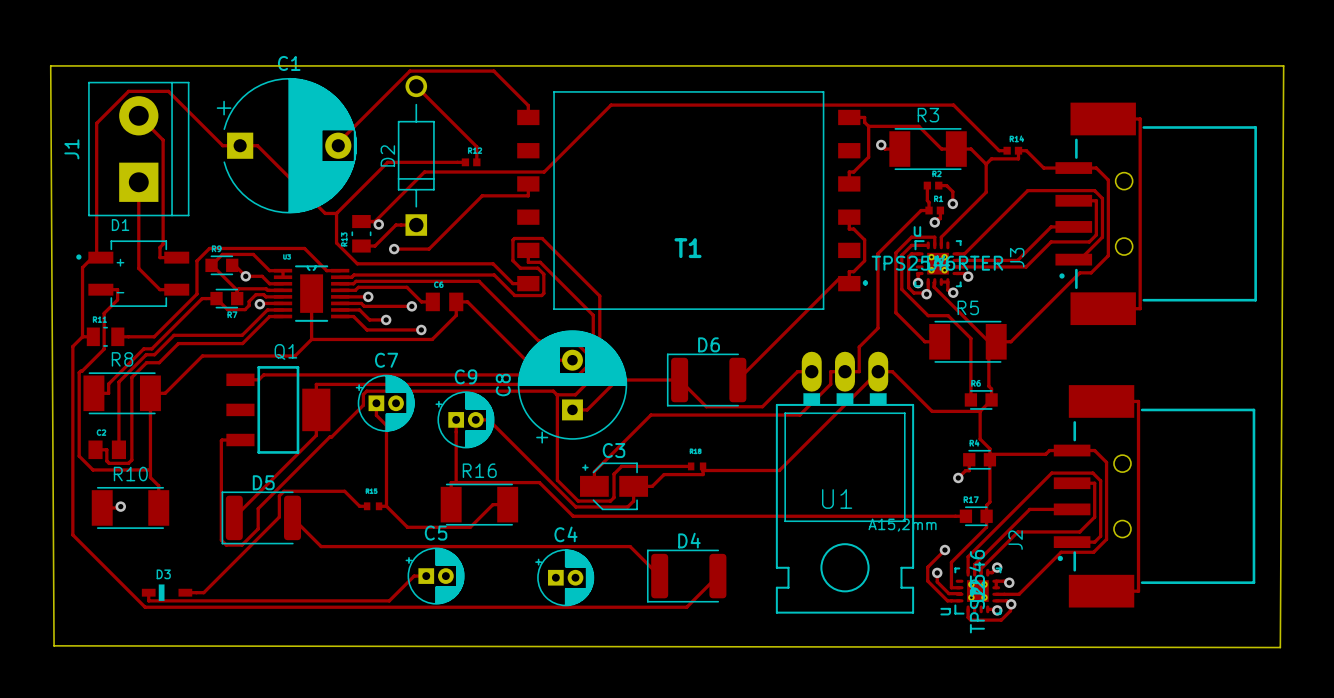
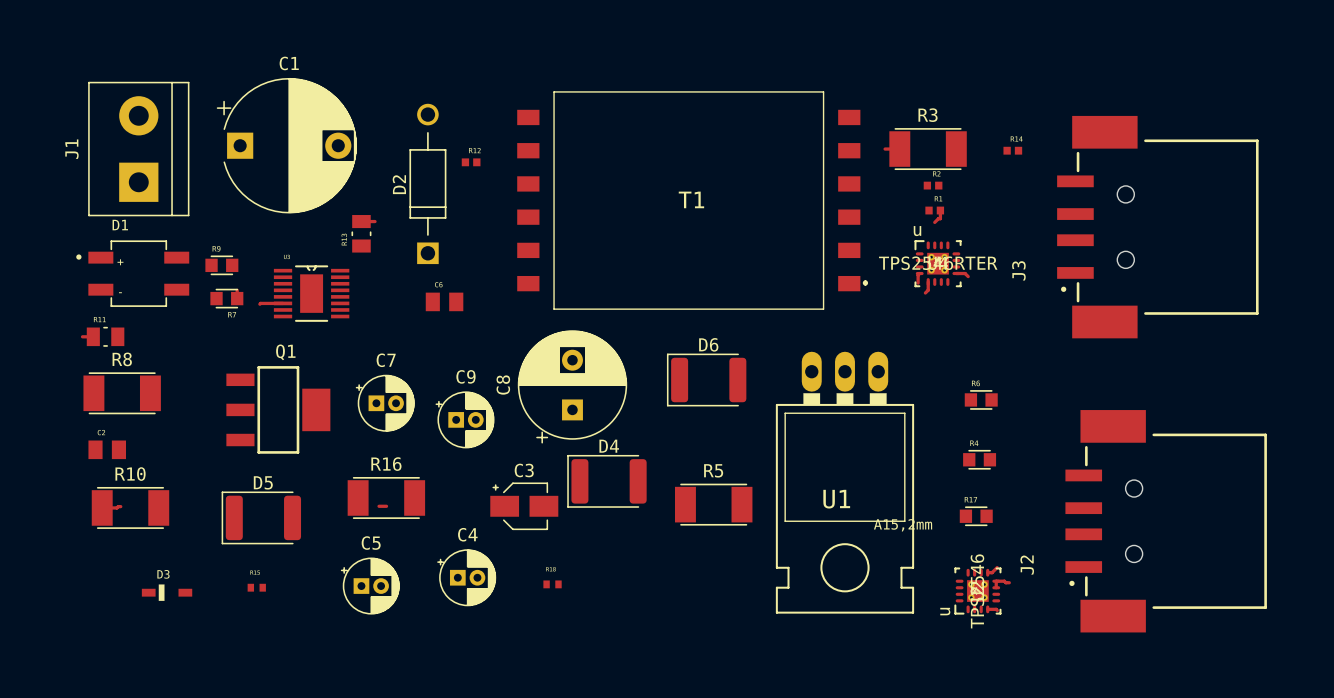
board edge: (50, 65) (54, 645) (1280, 647) (1283, 65) (50, 65) -> none
track: (416, 86) (476, 146) (476, 162) -> none
track: (138, 115) (163, 140) (163, 244) (159, 247) (159, 257) (176, 257) -> none
track: (528, 117) (528, 105) (493, 71) (409, 71) (338, 142) (338, 145) -> none
track: (849, 117) (864, 117) (864, 122) (868, 126) -> none
track: (1103, 118) (1140, 118) (1140, 308) (1103, 308) -> none
track: (868, 126) (868, 157) (853, 172) (849, 172) (849, 183) -> none
track: (868, 126) (918, 126) (941, 149) (971, 149) (986, 164) -> none
via: (881, 144) -> none
track: (1007, 150) (999, 150) (953, 105) (611, 105) (544, 172) (424, 172) (375, 221) (378, 224) -> none
D2 position: (416, 155) -> (427, 183)
track: (465, 162) (387, 162) (336, 213) -> none
track: (986, 164) (991, 158) (1018, 158) (1018, 150) (1026, 150) (1043, 168) (1096, 168) (1108, 180) (1108, 255) (1091, 272) (1079, 272) (1010, 341) (988, 341) -> none
track: (986, 164) (986, 192) (941, 237) (941, 245) -> none
track: (138, 182) (138, 268) (159, 289) (176, 289) -> none
track: (528, 183) (528, 195) (482, 195) (429, 249) (394, 249) -> none
track: (927, 185) (929, 210) (921, 210) (877, 253) (877, 328) (859, 347) (859, 371) (830, 371) (830, 384) (799, 415) (650, 415) (594, 471) (594, 486) -> none
track: (938, 185) (946, 185) (952, 191) (952, 203) -> none
track: (1073, 200) (1096, 200) (1096, 234) (1089, 241) (1051, 241) (1026, 266) (956, 266) -> none
via: (952, 203) -> none
track: (336, 213) (336, 243) (357, 263) (493, 263) (512, 283) (528, 283) -> none
track: (336, 213) (325, 213) (257, 145) (222, 145) (168, 91) (128, 91) (96, 123) (96, 257) -> none
J3 position: (1156, 213) -> (1157, 227)
track: (849, 217) (849, 229) (853, 229) (864, 239) (864, 260) (853, 271) (849, 271) (849, 283) -> none
via: (934, 222) -> none
via: (378, 224) -> none
track: (416, 225) (395, 225) (375, 246) (361, 246) -> none
track: (1073, 226) (1051, 226) (1017, 260) (956, 260) -> none
track: (928, 245) (911, 245) (901, 255) (901, 289) (928, 315) (948, 315) (970, 338) (970, 399) -> none
track: (934, 245) (934, 237) (911, 237) (895, 252) (895, 312) (924, 341) (939, 341) -> none
T1 name position: T1 (688, 248) -> T1 (691, 199)
via: (394, 249) -> none
track: (528, 250) (528, 262) (540, 262) (593, 315) (593, 368) (577, 384) (316, 384) (316, 435) (234, 517) -> none
track: (919, 253) (911, 253) (908, 256) (908, 287) (913, 293) (926, 294) -> none
track: (956, 253) (964, 253) (1027, 190) (1094, 190) (1102, 198) (1102, 237) (1080, 259) (1073, 259) -> none
track: (100, 257) (92, 257) (82, 267) (82, 336) (72, 346) (72, 534) (145, 607) (686, 607) (717, 576) -> none
track: (232, 265) (234, 265) (245, 276) (262, 276) (269, 283) (283, 283) -> none
track: (340, 270) (326, 270) (304, 248) (209, 248) (196, 261) (196, 294) (154, 336) (117, 336) -> none
via: (245, 276) -> none
via: (968, 276) -> none
track: (283, 277) (283, 270) (269, 270) (253, 254) (222, 254) (211, 265) (237, 290) (238, 288) (283, 290) -> none
track: (340, 277) (351, 277) (354, 275) (494, 275) (514, 295) (541, 295) (543, 293) (543, 274) (537, 268) (520, 268) (512, 260) (512, 240) (514, 238) (542, 238) (599, 296) (599, 370) (575, 394) (557, 395) -> none
track: (849, 277) (840, 277) (737, 380) -> none
track: (934, 282) (934, 287) (988, 341) -> none
track: (941, 282) (947, 282) (947, 290) (953, 292) -> none
track: (340, 283) (353, 283) (356, 281) (479, 281) (538, 341) (574, 341) (587, 353) (587, 366) (578, 374) (263, 374) (258, 379) (240, 379) -> none
via: (918, 283) -> none
track: (100, 289) (117, 289) (117, 299) (104, 313) (104, 349) (79, 372) (79, 456) (93, 469) (150, 469) -> none
track: (340, 290) (355, 290) (358, 287) (406, 287) (421, 301) (432, 301) -> none
via: (953, 292) -> none
track: (311, 293) (311, 339) -> none
via: (926, 294) -> none
track: (283, 296) (255, 294) (245, 309) (227, 309) (216, 298) (202, 298) (151, 348) (143, 348) (108, 384) (108, 393) (93, 393) -> none
track: (340, 296) (368, 296) -> none
via: (368, 296) -> none
track: (340, 303) (361, 303) (364, 306) (411, 306) -> none
via: (259, 304) -> none
via: (411, 306) -> none
track: (283, 309) (267, 309) (242, 335) (174, 335) (154, 354) (146, 354) (118, 382) (118, 449) -> none
track: (340, 309) (359, 309) (369, 319) (386, 319) -> none
track: (283, 316) (269, 316) (242, 343) (178, 343) (159, 362) (146, 362) (131, 377) (131, 460) (128, 463) (109, 463) (106, 461) (106, 449) (95, 449) -> none
track: (340, 316) (353, 316) (367, 329) (421, 329) -> none
via: (386, 319) -> none
via: (421, 329) -> none
track: (311, 339) (295, 356) (202, 356) (165, 393) (150, 393) (150, 477) (158, 485) (158, 507) -> none
track: (311, 339) (432, 339) (456, 315) (456, 301) (467, 301) (525, 360) (572, 360) -> none
R5 position: (967, 341) -> (713, 504)
track: (988, 341) (988, 386) (991, 389) (991, 399) (980, 411) -> none
track: (811, 371) (797, 371) (762, 406) (706, 406) (679, 380) (617, 380) (587, 409) (572, 409) -> none
track: (557, 395) (553, 391) (366, 391) (363, 394) (363, 405) (258, 508) (258, 528) (242, 545) (226, 545) (221, 540) (221, 440) (240, 440) -> none
track: (557, 395) (557, 480) (578, 501) (610, 501) (614, 497) (614, 474) (621, 466) (691, 466) -> none
track: (1101, 401) (1138, 401) (1138, 591) (1101, 591) -> none
track: (376, 403) (376, 415) (386, 425) (386, 506) (407, 527) (470, 527) (492, 504) (507, 504) -> none
track: (980, 411) (980, 439) (989, 448) (989, 502) (986, 505) (986, 527) (951, 562) (951, 587) (959, 587) -> none
track: (980, 411) (932, 411) (892, 371) (878, 371) (779, 470) (703, 470) -> none
track: (456, 419) (456, 482) -> none
track: (475, 419) (488, 419) (575, 506) (627, 506) (633, 501) (633, 486) (652, 486) (664, 474) (703, 474) (703, 466) -> none
track: (989, 454) (1045, 454) (1049, 450) (1094, 450) (1106, 462) (1106, 539) (1093, 552) (1061, 552) (1019, 594) (996, 594) -> none
track: (969, 459) (969, 470) (965, 470) (958, 477) -> none
part position: (697, 466) -> (552, 584)
via: (958, 477) -> none
track: (1072, 483) (1094, 483) (1094, 517) (1079, 531) (1017, 531) (980, 569) (981, 572) -> none
C3 position: (614, 486) -> (524, 506)
J2 position: (1154, 496) -> (1166, 521)
track: (451, 504) (451, 482) (539, 482) (573, 516) (965, 516) -> none
R16 position: (479, 504) -> (386, 497)
via: (120, 506) -> none
track: (367, 506) (359, 506) (344, 491) (284, 491) (279, 495) (279, 517) (203, 592) (185, 592) -> none
part position: (373, 506) -> (256, 587)
track: (1072, 509) (1029, 509) (974, 564) (974, 572) -> none
track: (292, 517) (321, 546) (630, 546) (659, 576) -> none
track: (1072, 542) (1094, 542) (1100, 536) (1100, 480) (1092, 473) (1051, 473) (968, 556) (968, 572) -> none
track: (944, 550) (927, 567) (927, 581) (947, 600) (959, 600) -> none
via: (944, 550) -> none
via: (997, 567) -> none
track: (937, 572) (937, 581) (948, 593) (959, 594) -> none
via: (937, 572) -> none
track: (426, 576) (414, 576) (389, 600) (148, 600) (148, 592) -> none
C5 position: (435, 576) -> (370, 586)
D4 position: (686, 576) -> (606, 481)
C4 position: (564, 577) -> (466, 577)
via: (1009, 582) -> none
track: (996, 600) (1006, 600) (1010, 604) -> none
track: (1010, 604) (1010, 610) (1001, 620) (970, 620) (968, 617) (968, 609) -> none
via: (1011, 604) -> none
via: (997, 610) -> none

